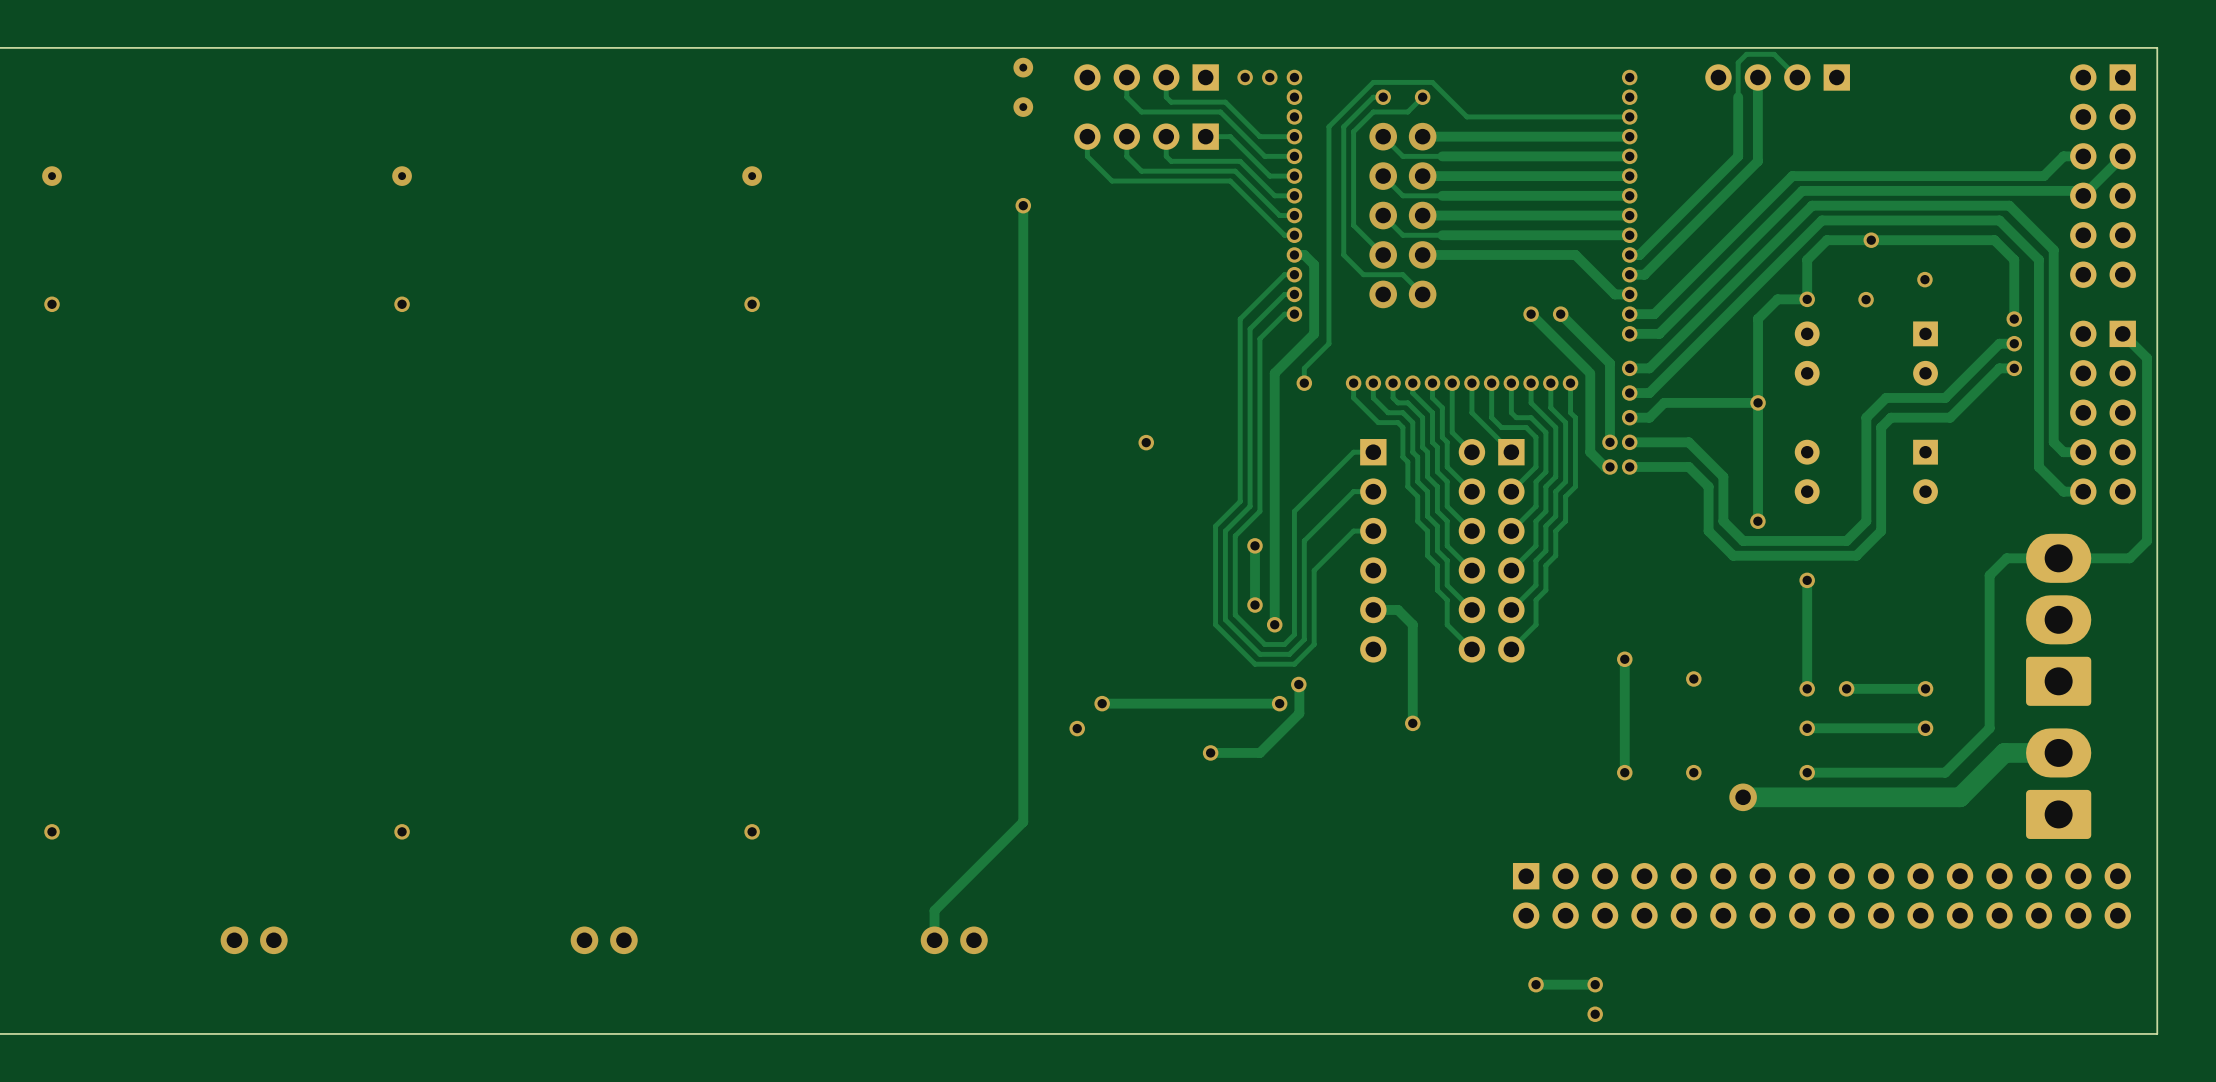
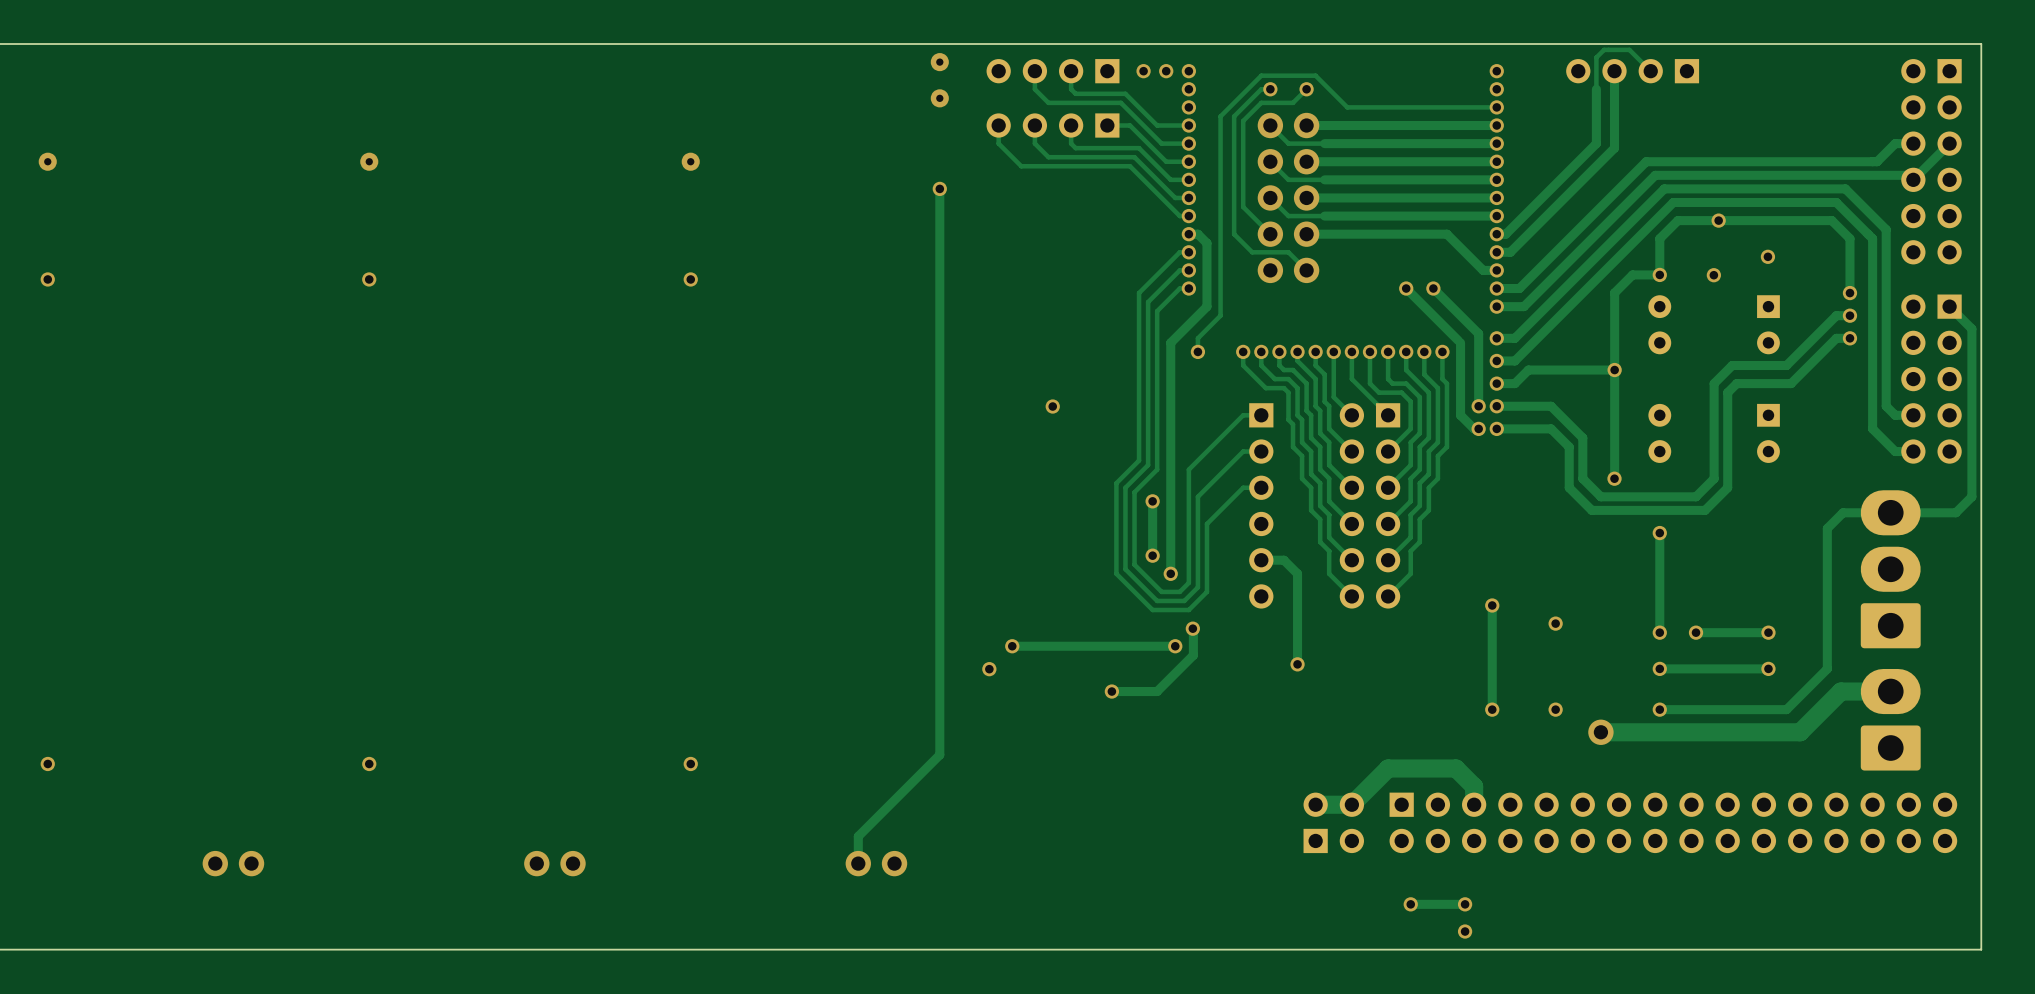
track: none -> (1474, 804) (1474, 786) (1456, 768) (1388, 768) (1351, 804) (1315, 804)
part: none -> (1333, 822)

